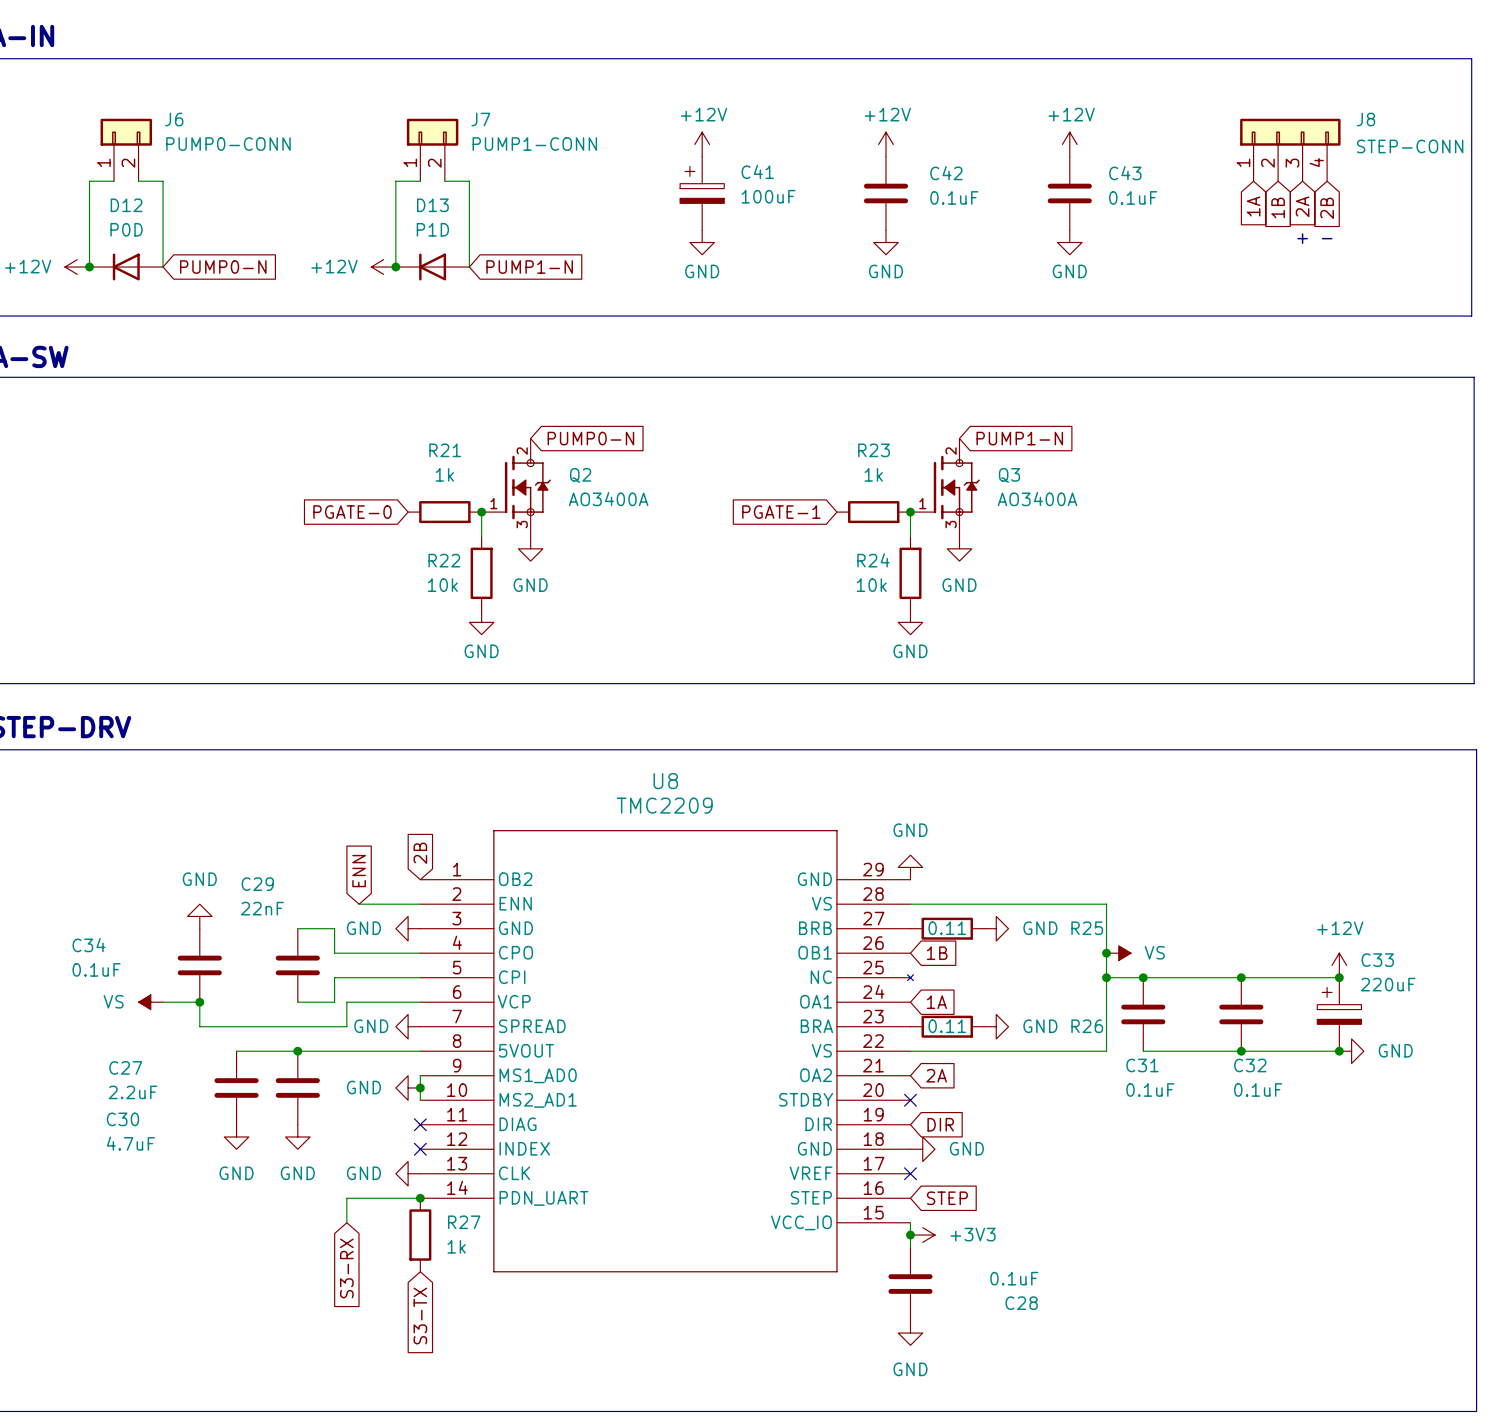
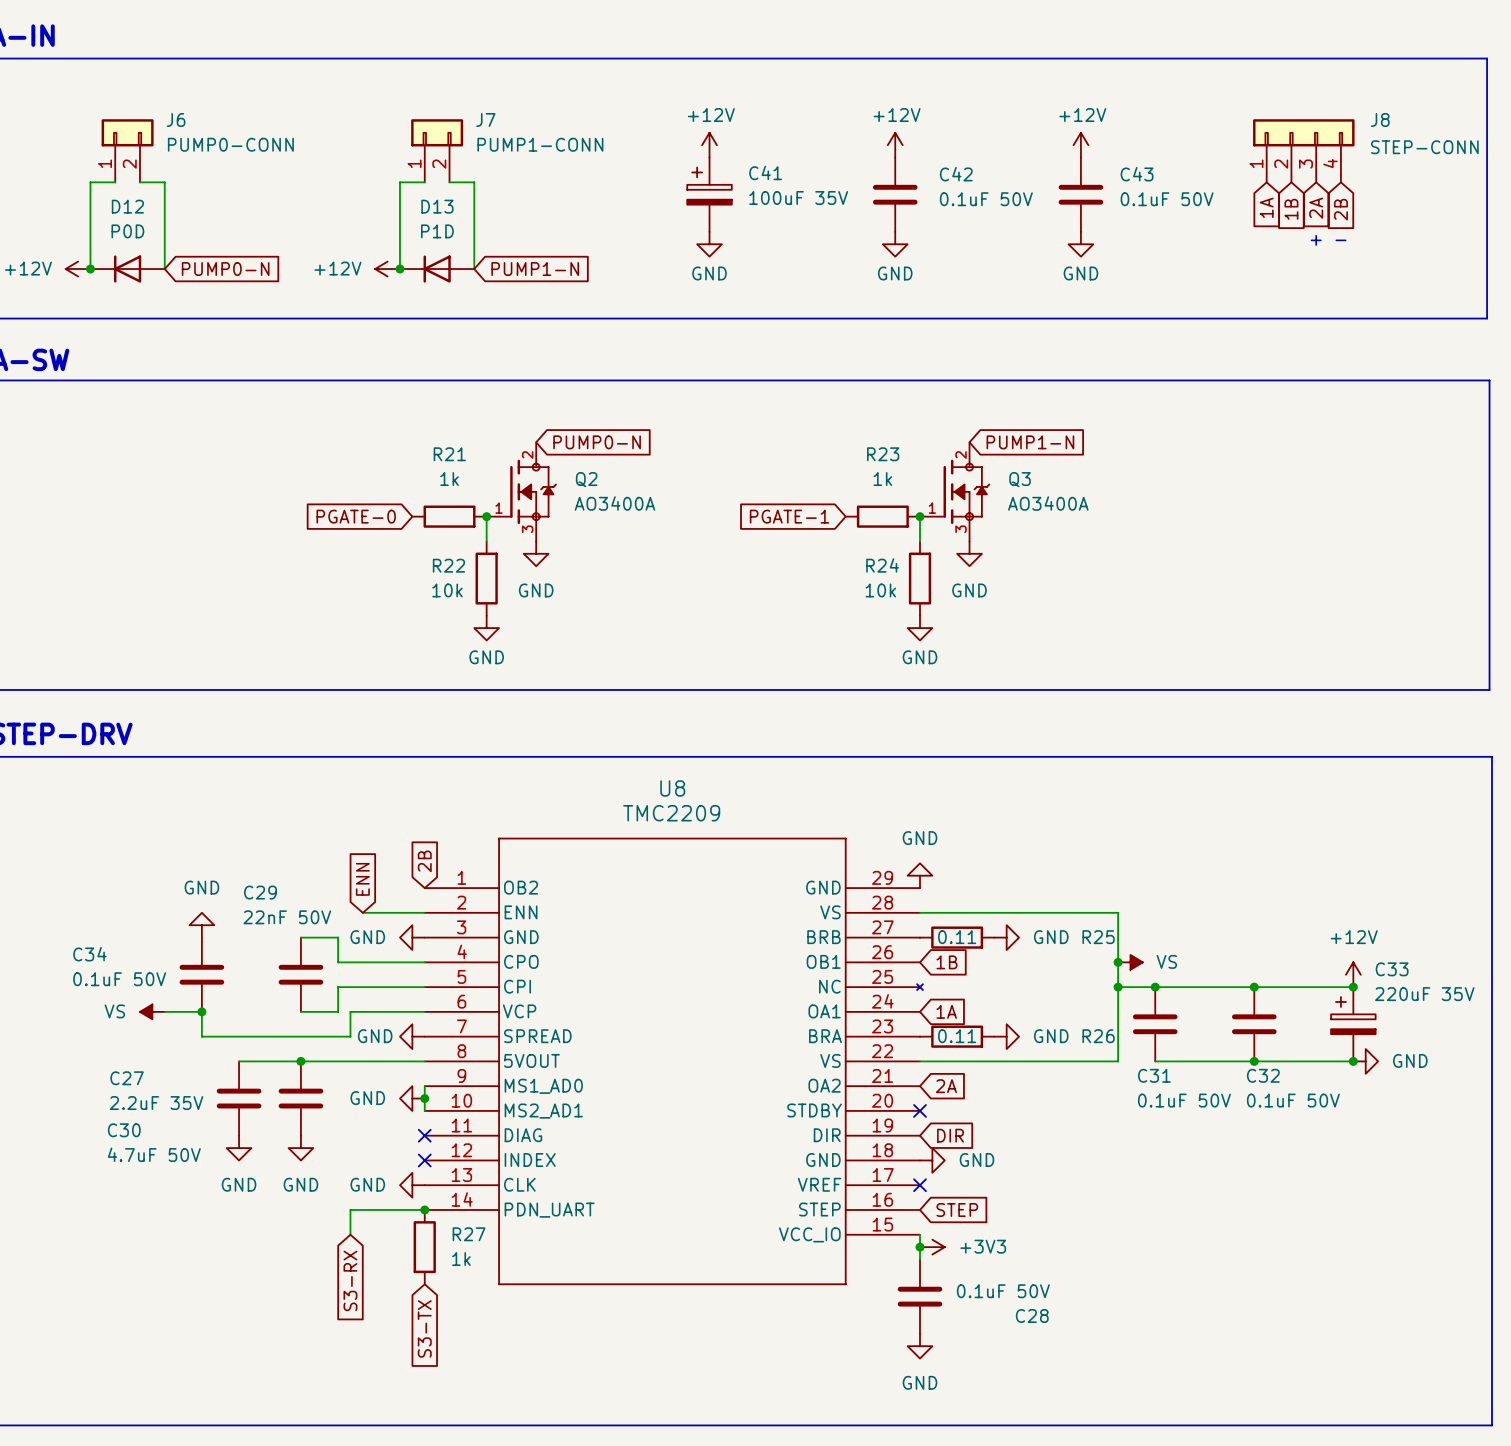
C41 value: 100uF (768, 196) -> 100uF 35V (798, 197)
C42 value: 0.1uF (954, 197) -> 0.1uF 50V (986, 199)
C43 value: 0.1uF (1133, 197) -> 0.1uF 50V (1167, 199)
C29 value: 22nF (262, 908) -> 22nF 50V (287, 917)
C34 value: 0.1uF (96, 969) -> 0.1uF 50V (119, 979)
C33 value: 220uF (1388, 984) -> 220uF 35V (1424, 994)
C31 value: 0.1uF (1150, 1089) -> 0.1uF 50V (1184, 1100)
C32 value: 0.1uF (1258, 1089) -> 0.1uF 50V (1293, 1100)
C27 value: 2.2uF (133, 1092) -> 2.2uF 35V (156, 1103)
C30 value: 4.7uF (130, 1143) -> 4.7uF 50V (154, 1154)
C28 value: 0.1uF (1014, 1278) -> 0.1uF 50V (1003, 1291)

